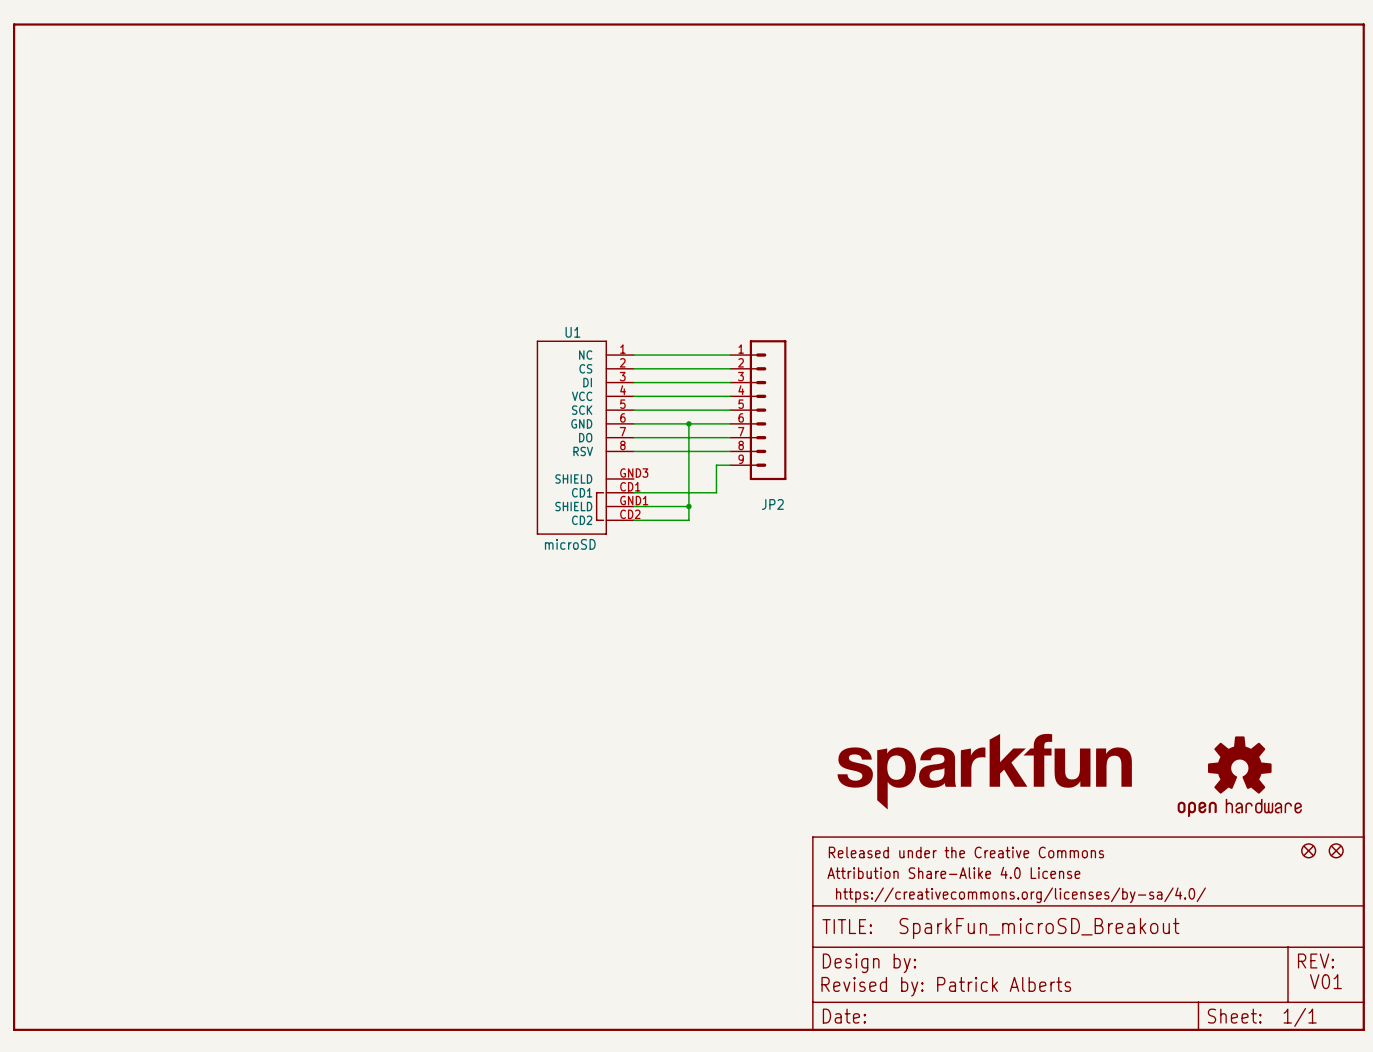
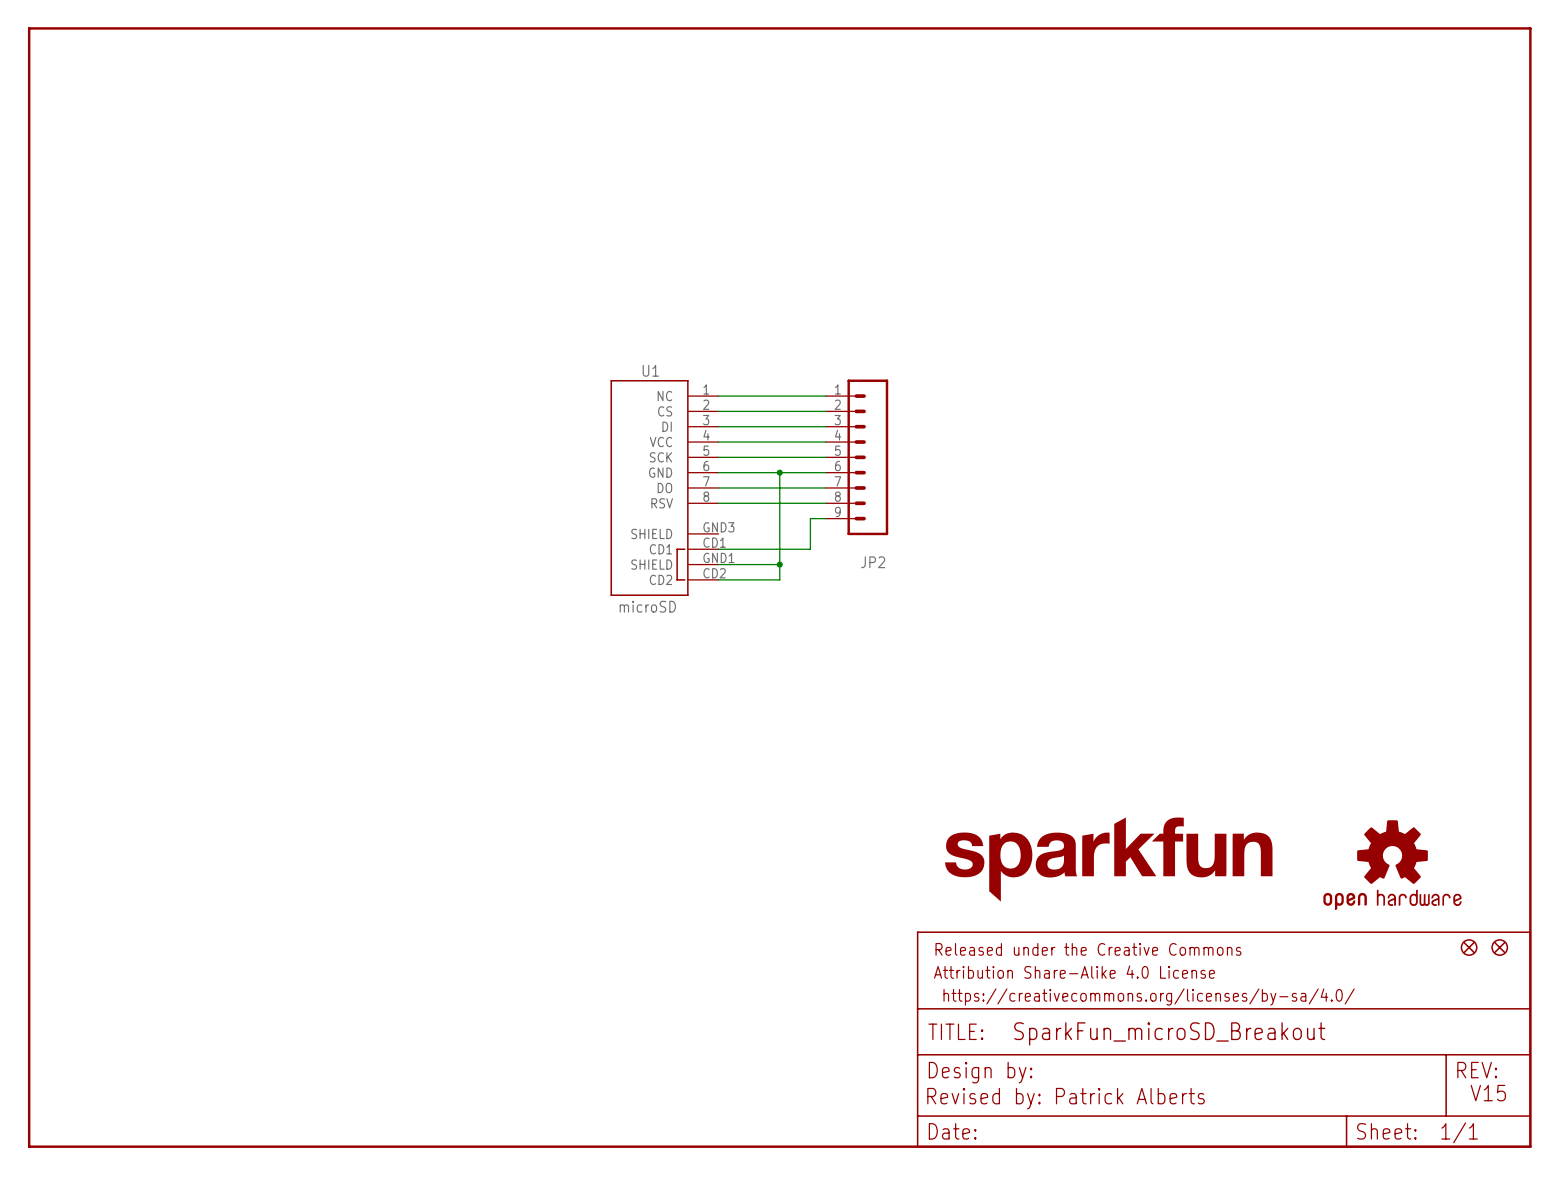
text: V01 (1325, 981) -> V15 (1488, 1093)

